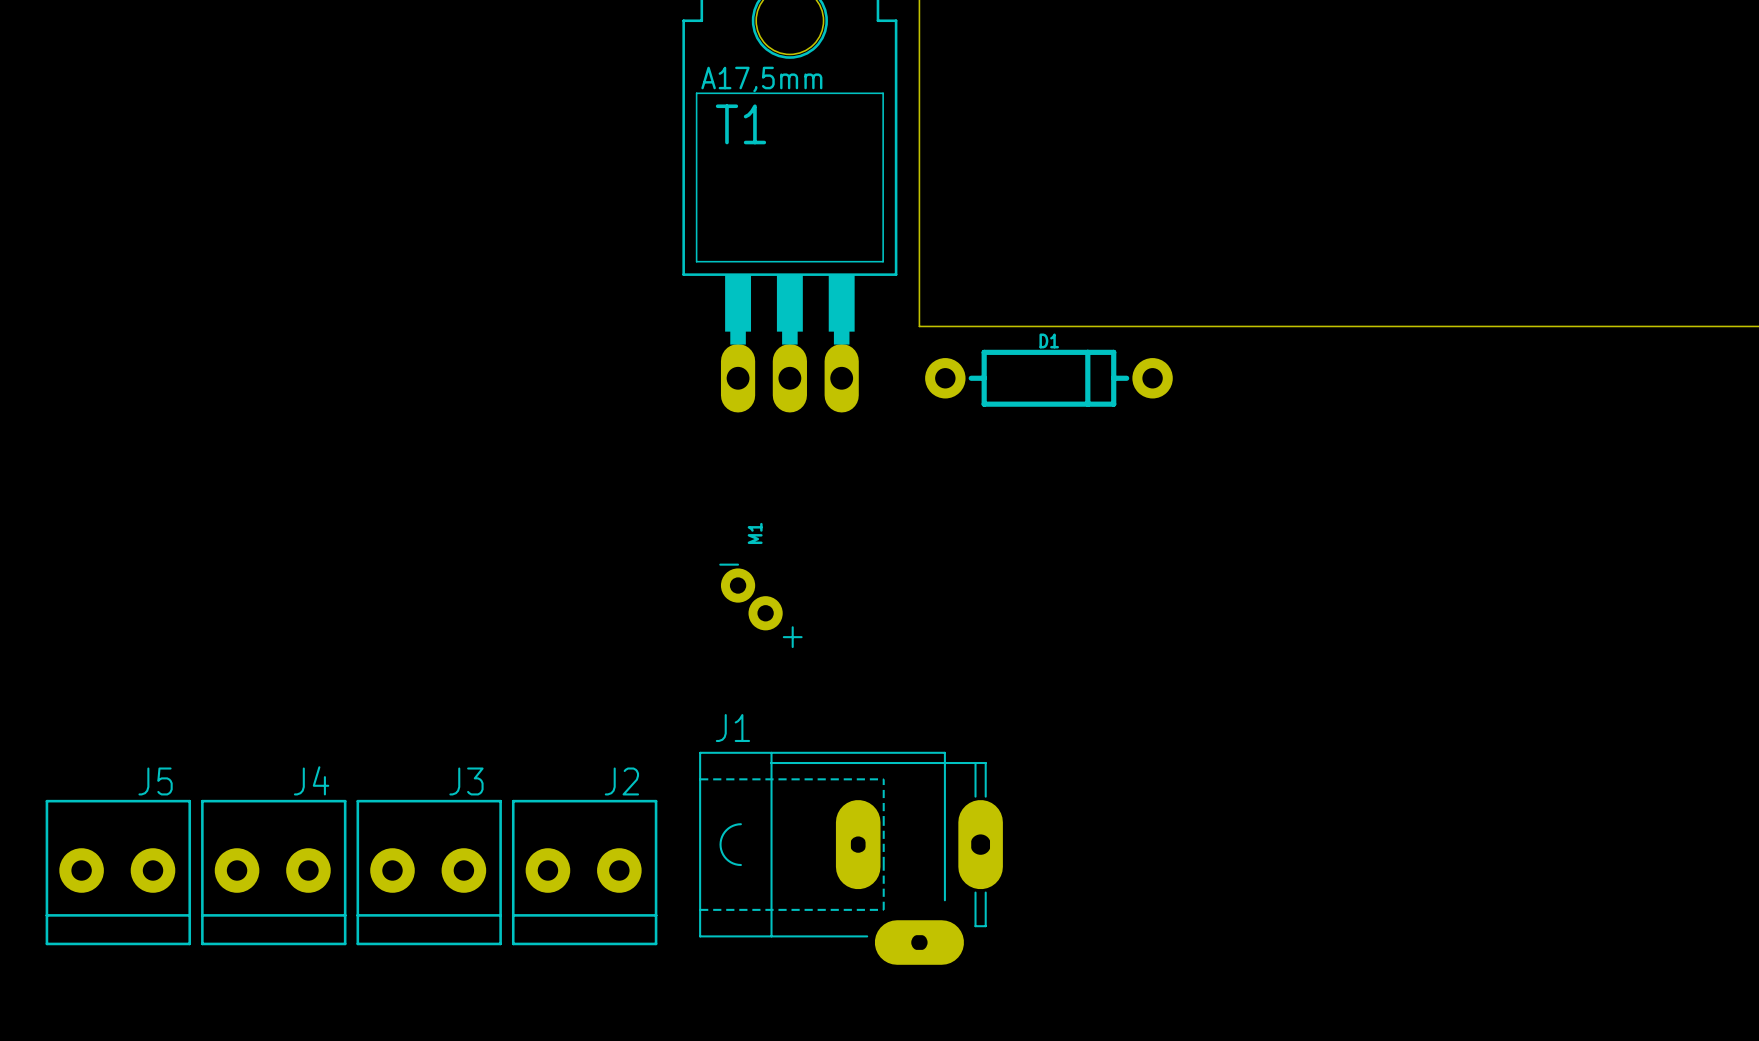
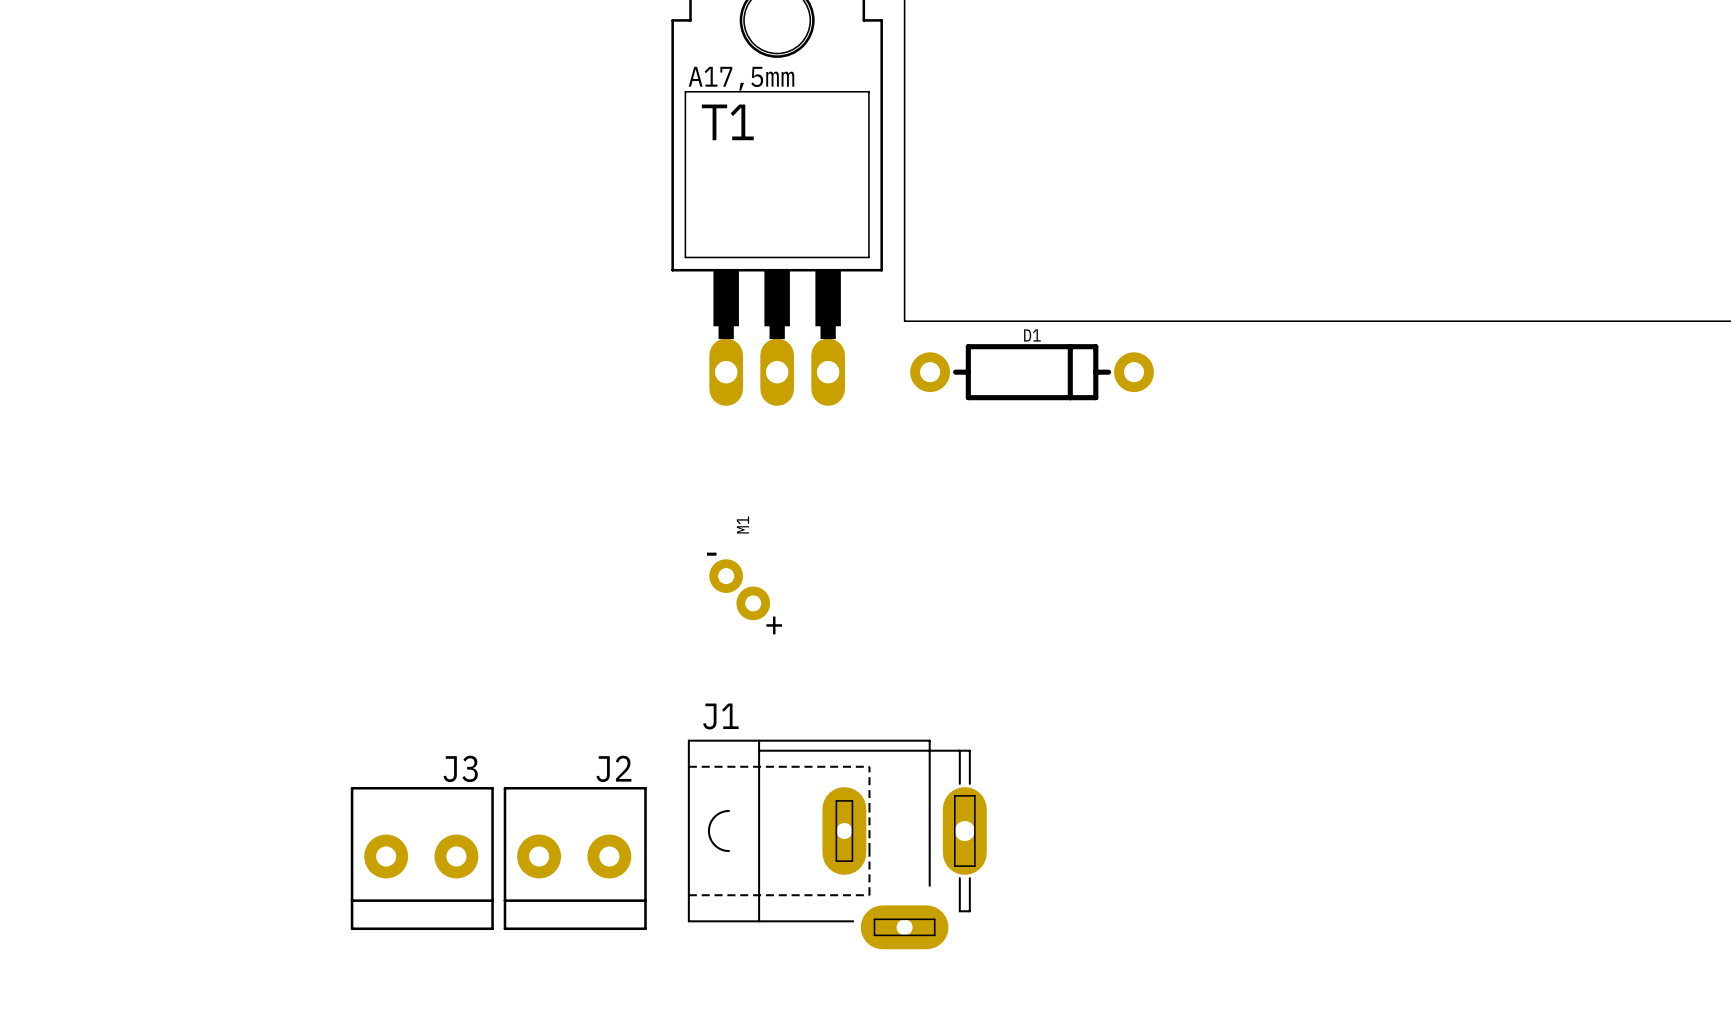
J5: (118, 872) -> none
J4: (273, 872) -> none

